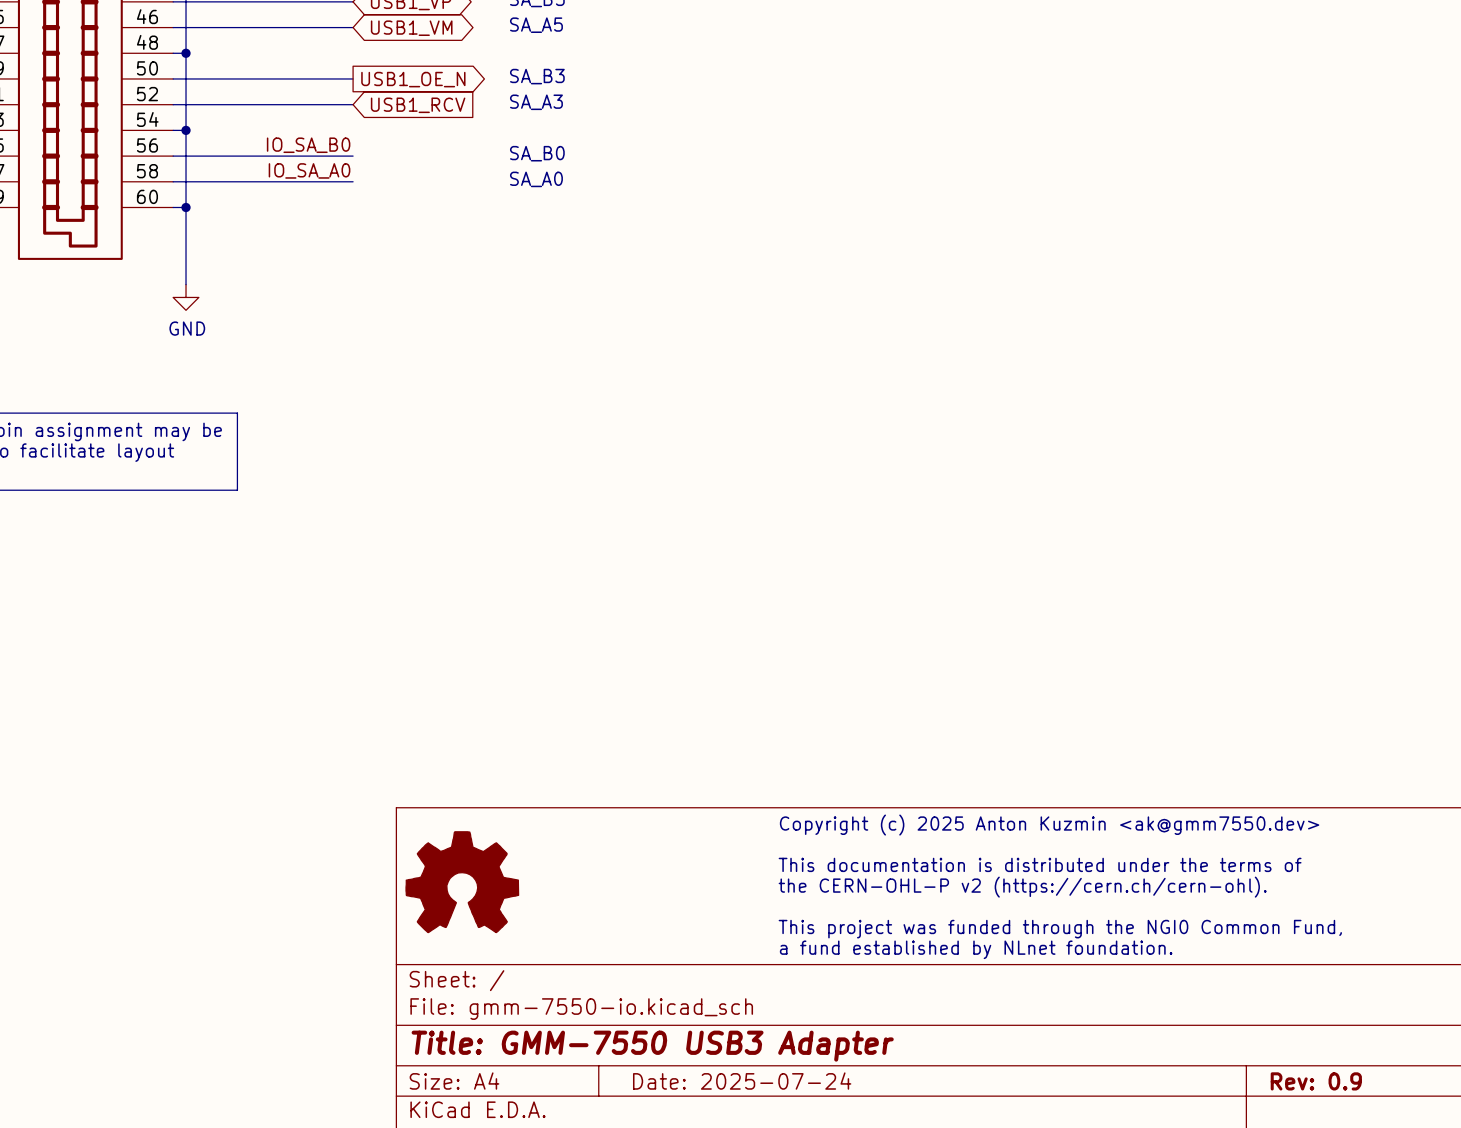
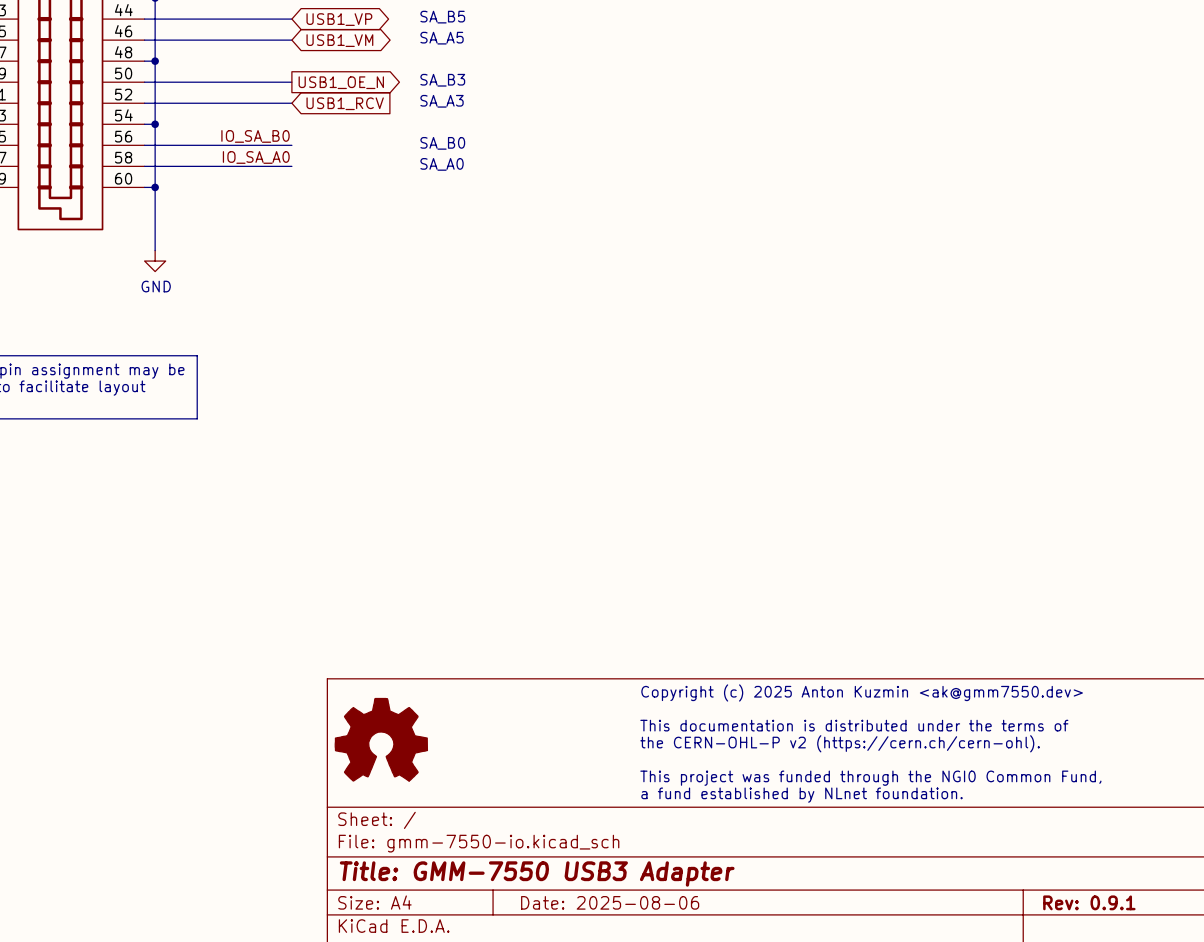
title block: Date: 2025-07-24 (742, 1081) -> Date: 2025-08-06 (610, 902)
title block: Rev: 0.9 (1316, 1081) -> Rev: 0.9.1 (1089, 902)

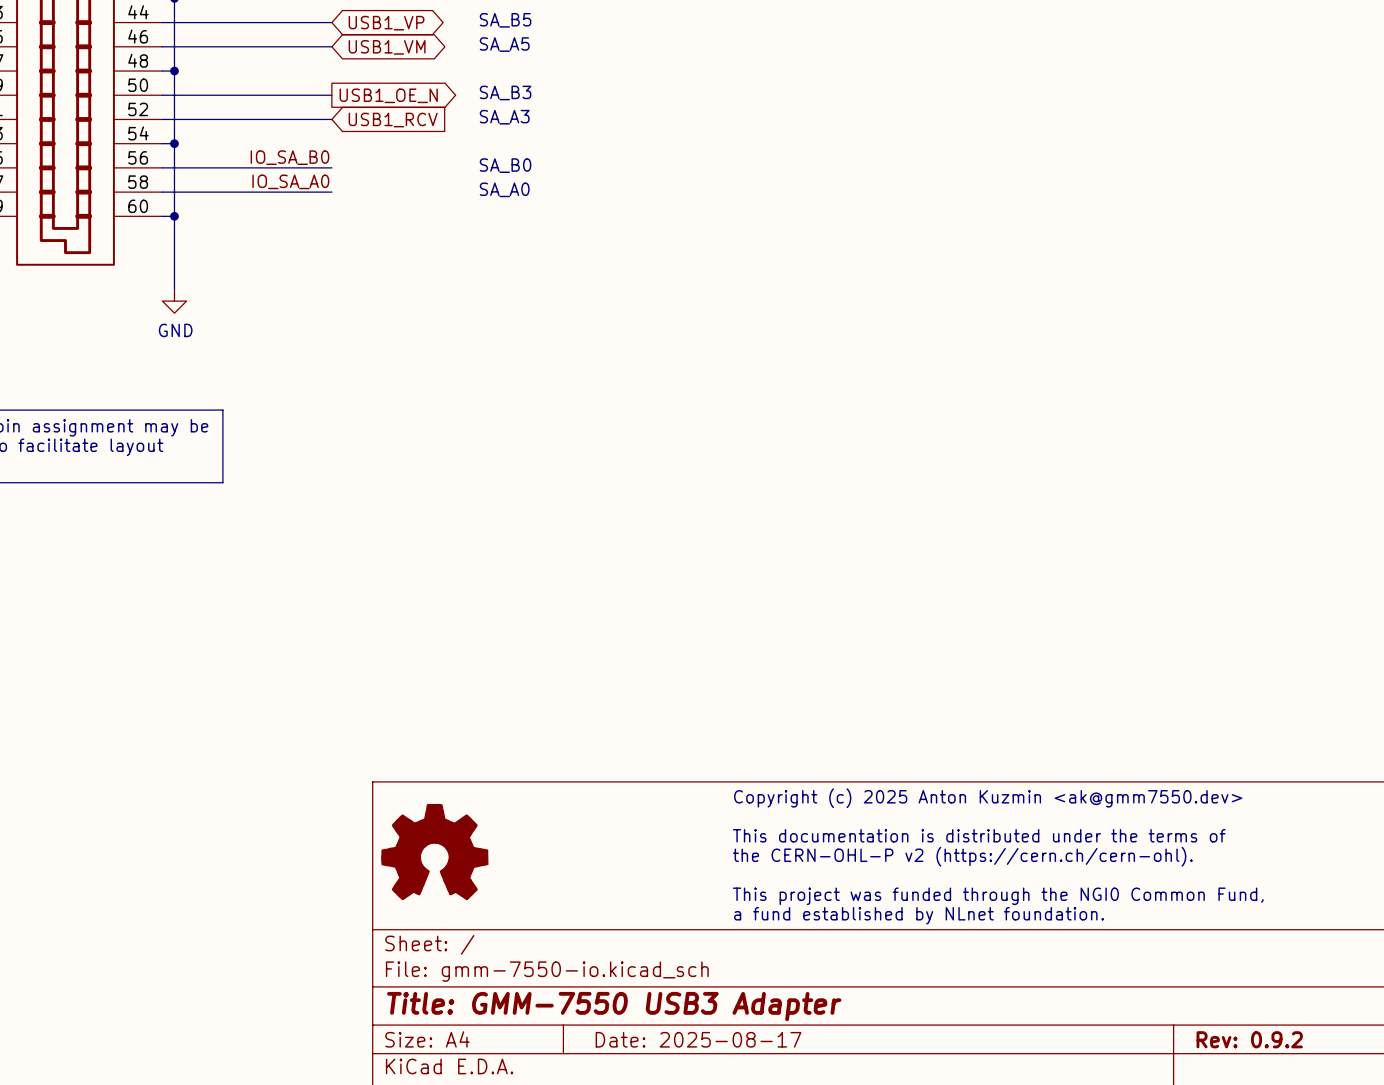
title block: Date: 2025-08-06 (610, 902) -> Date: 2025-08-17 (698, 1039)
title block: Rev: 0.9.1 (1089, 902) -> Rev: 0.9.2 (1249, 1039)

